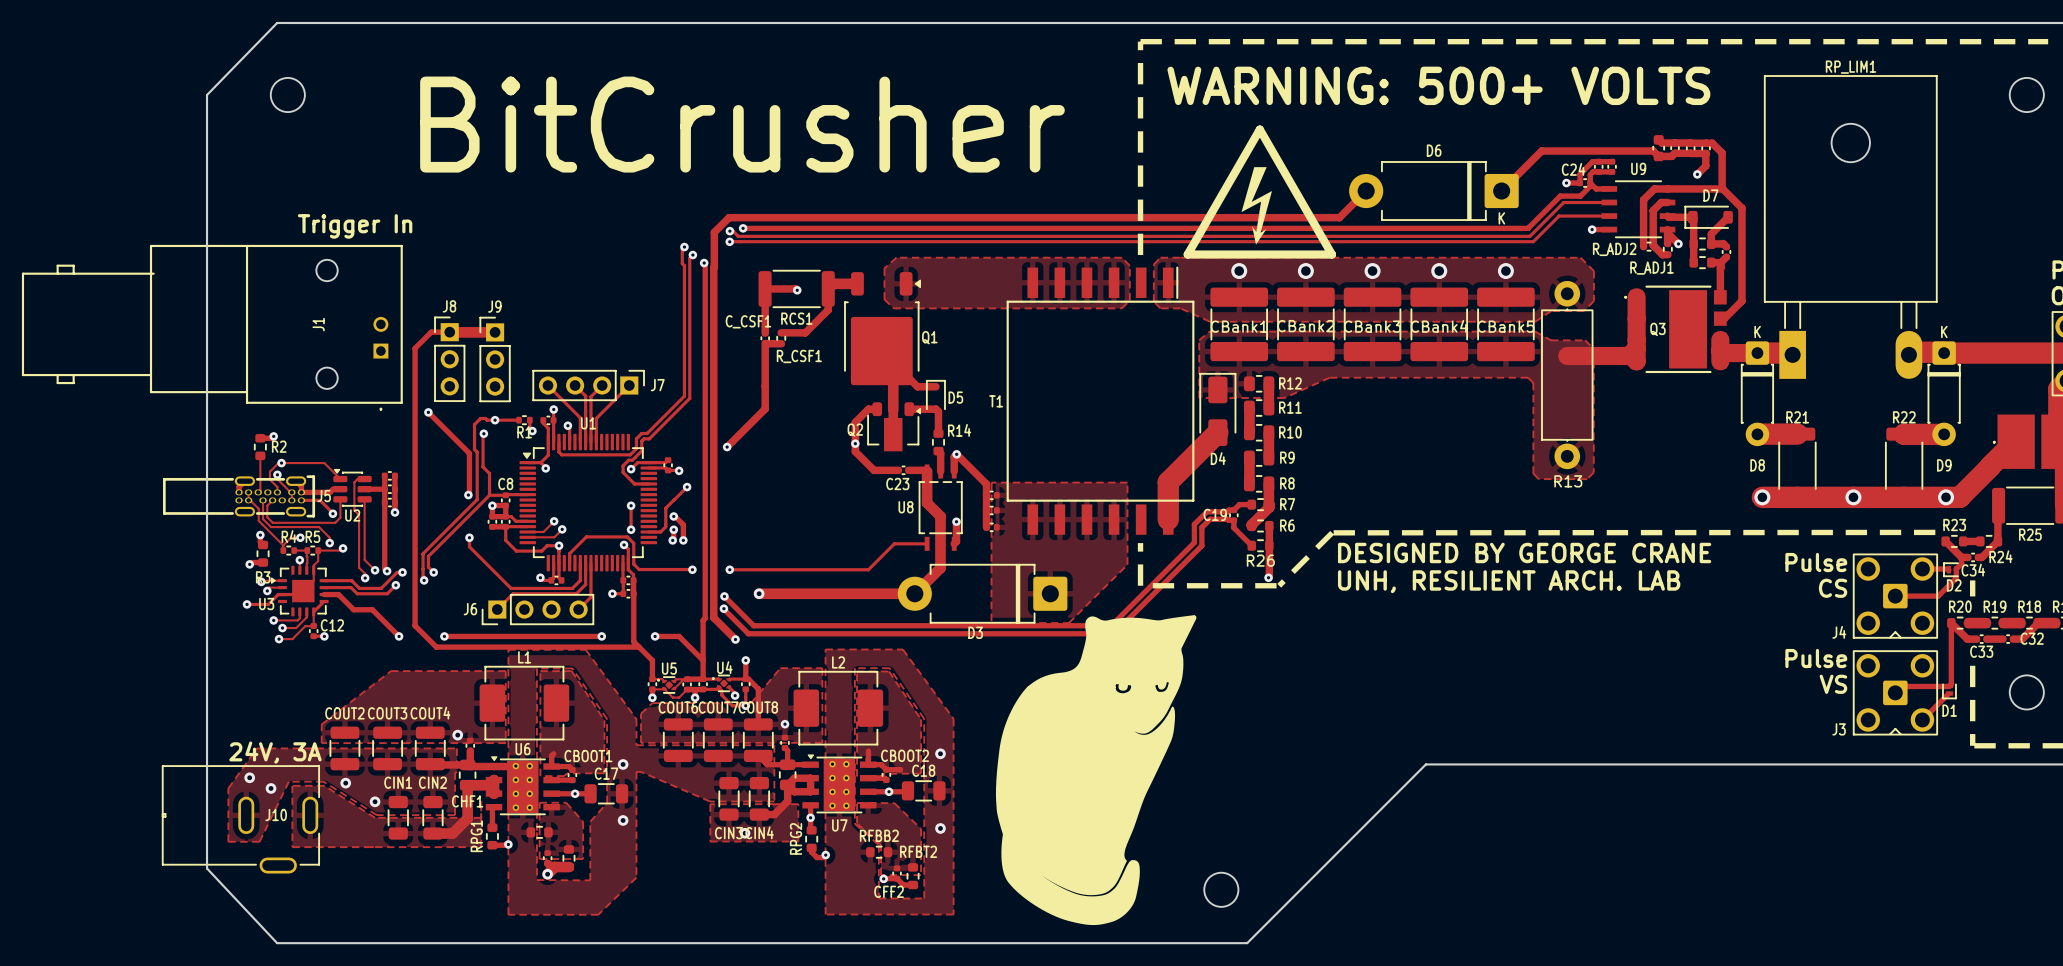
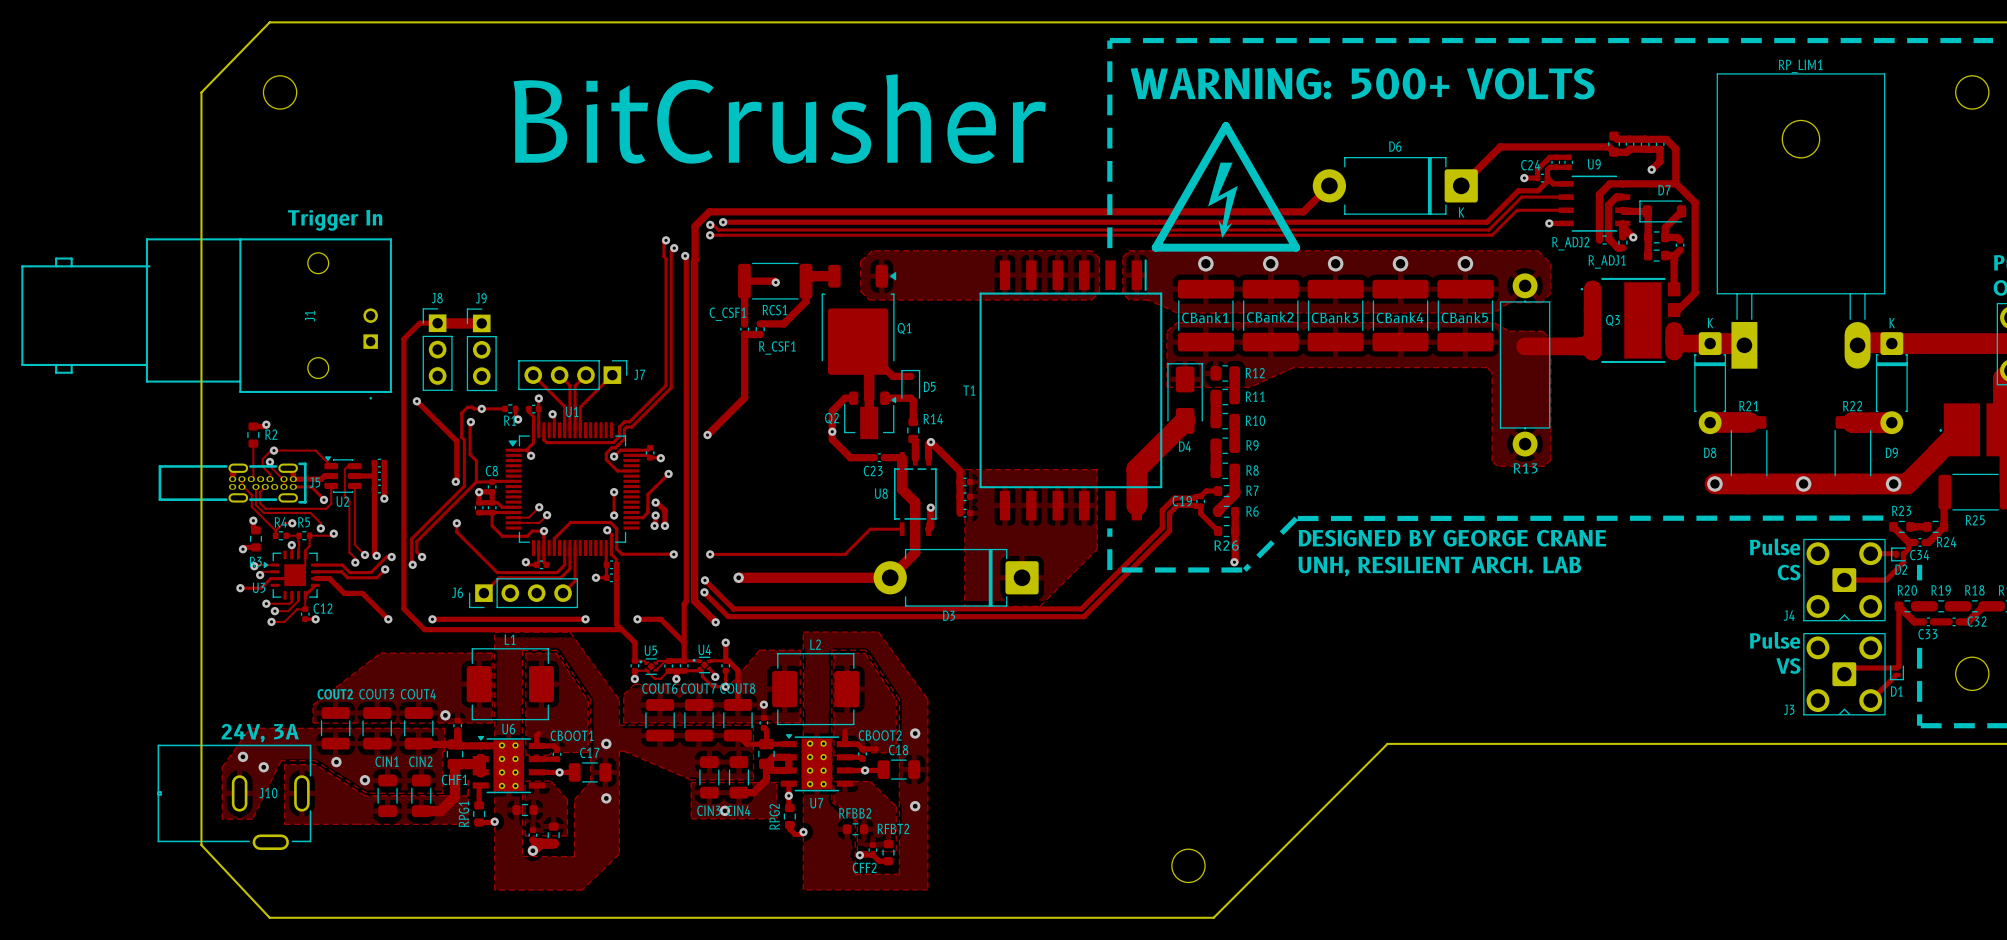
drawing: [995, 615, 1197, 926] -> none

